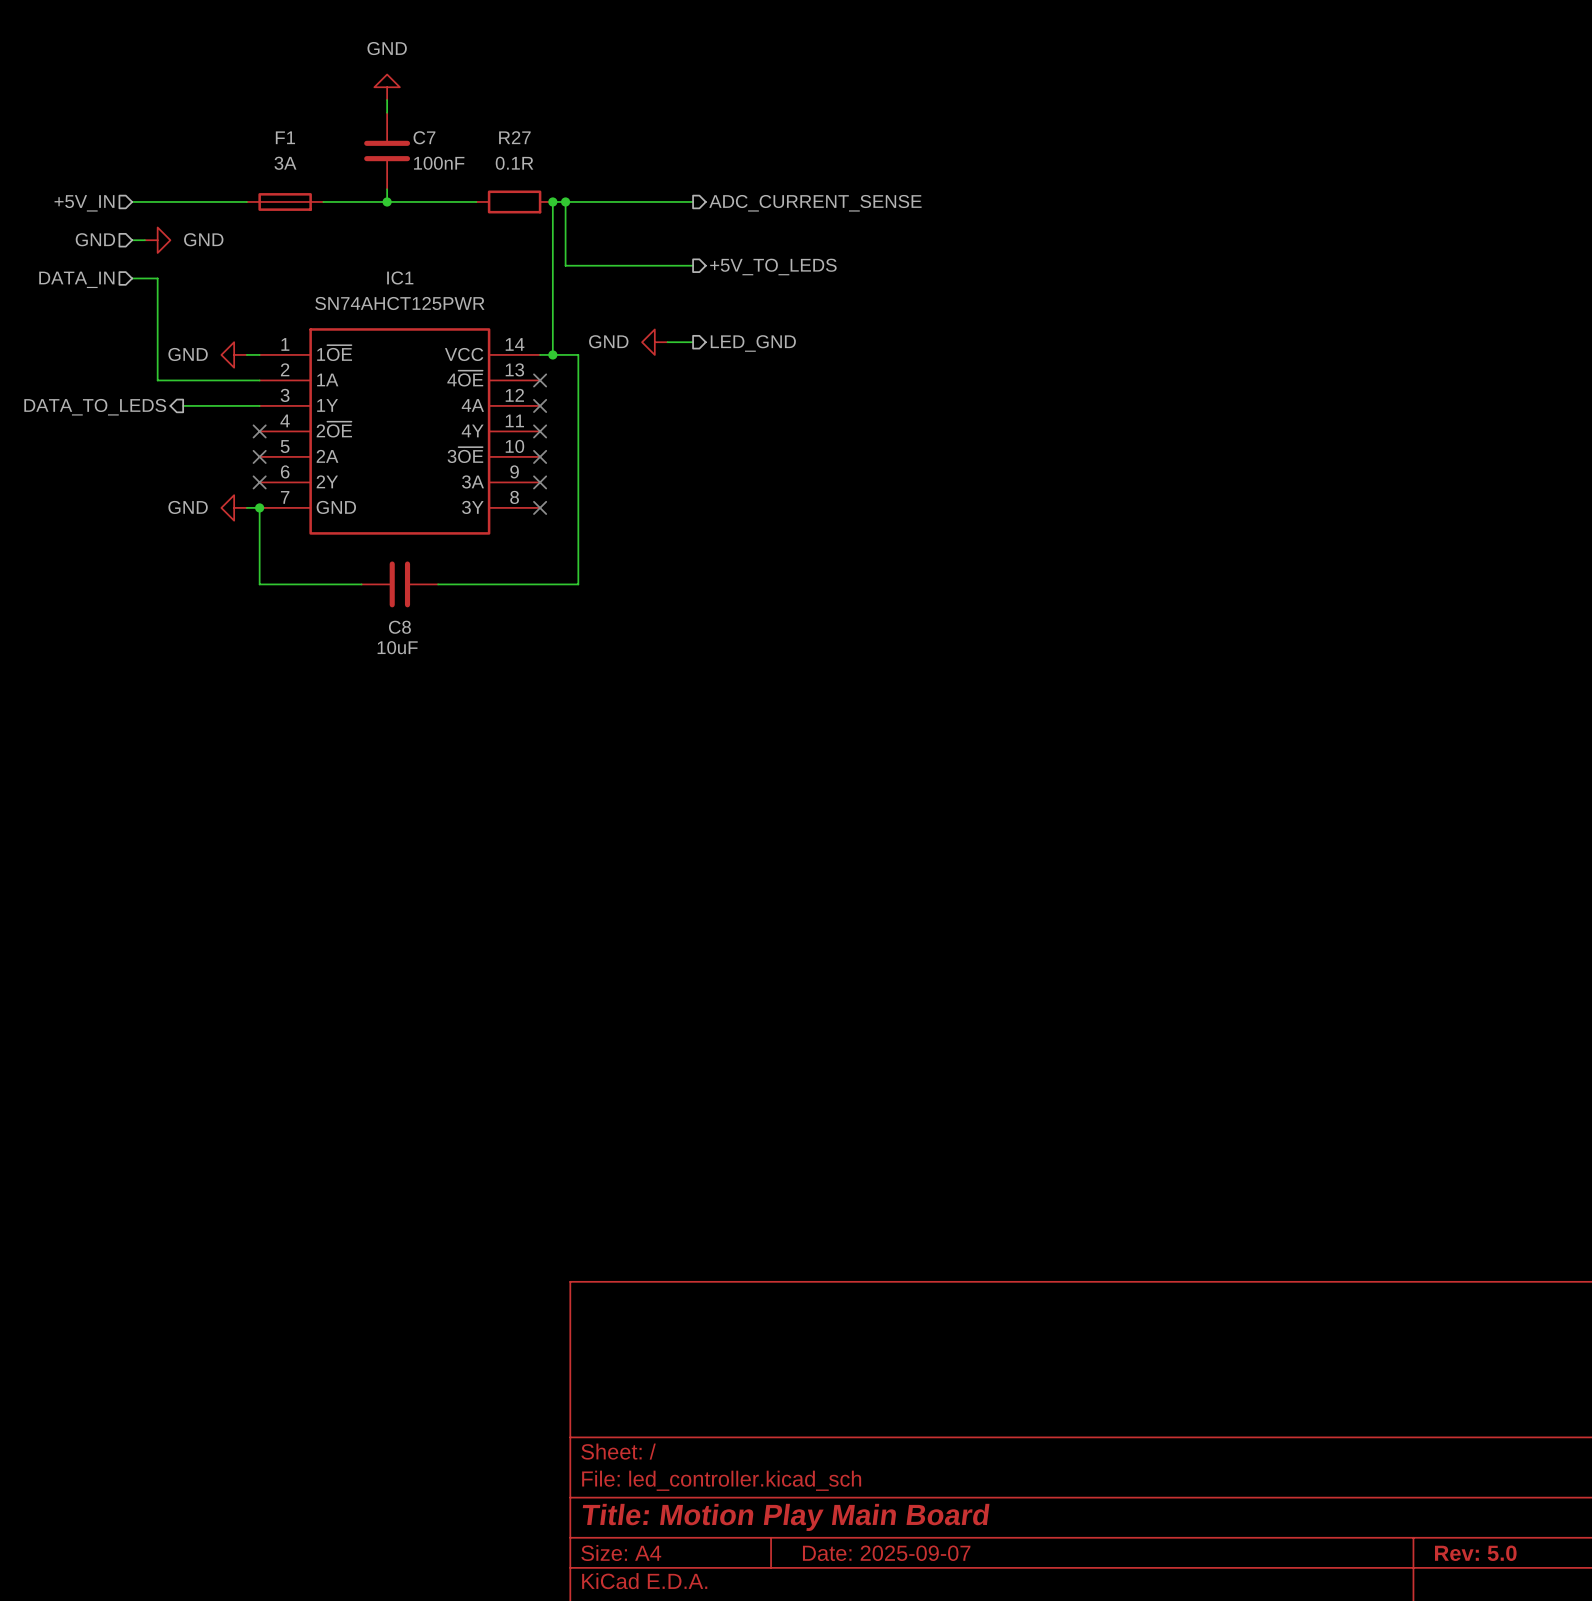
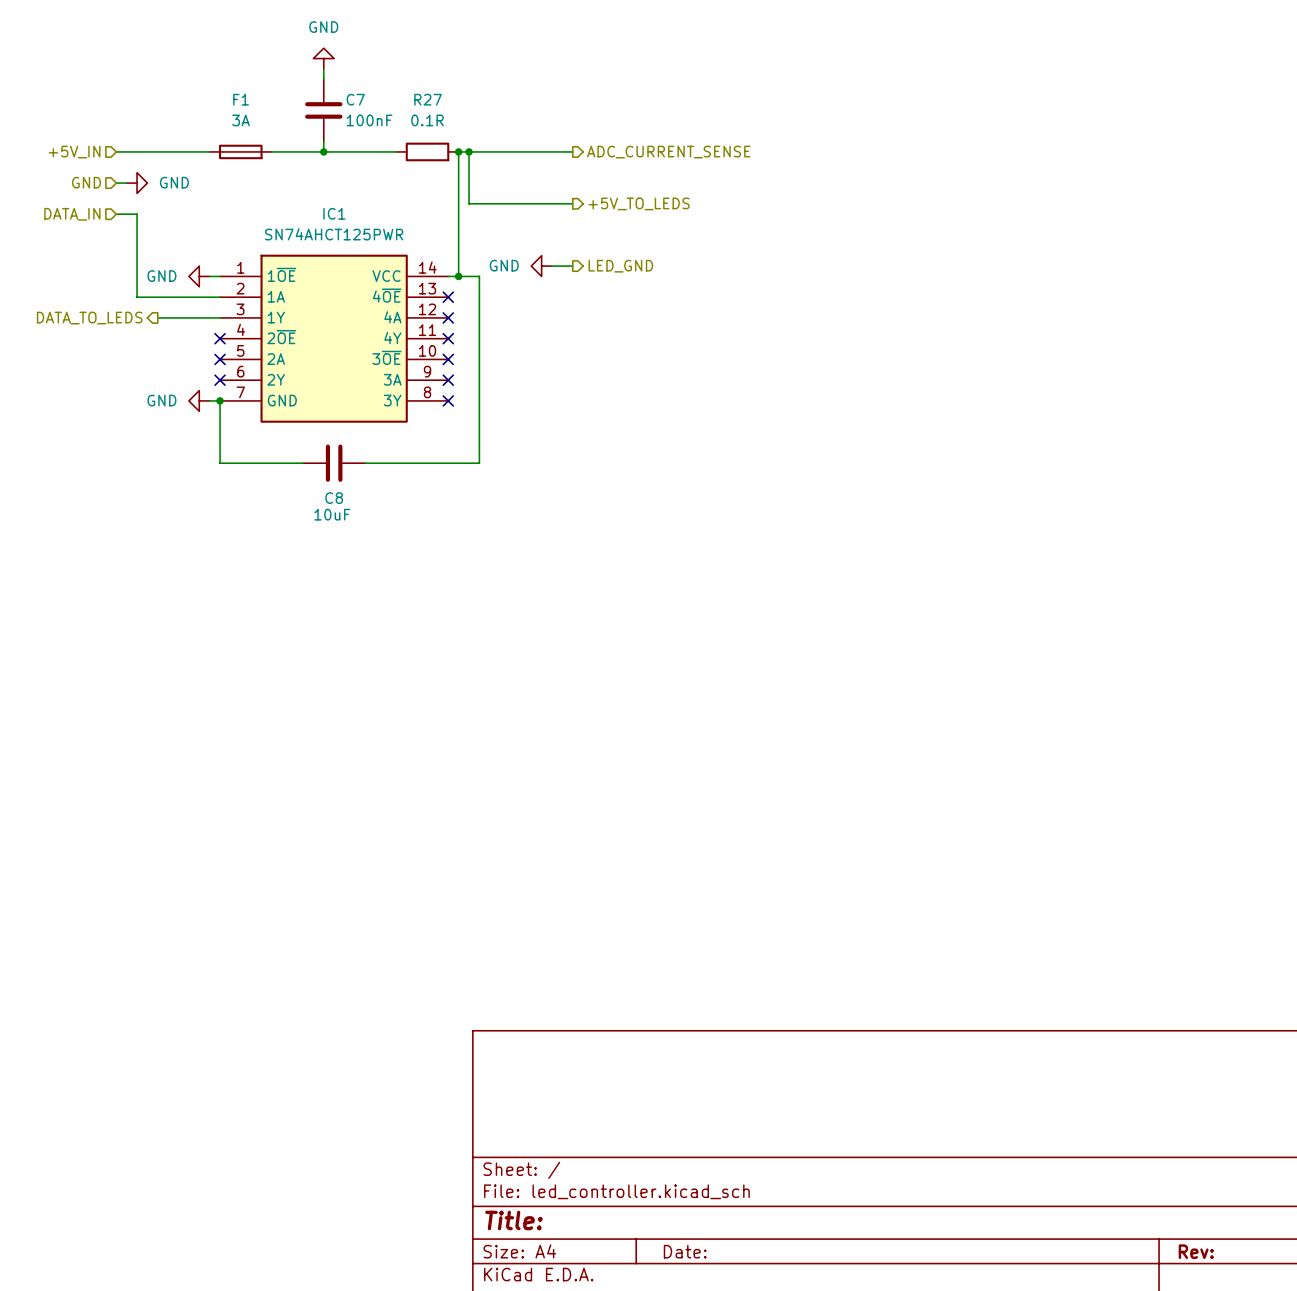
title block: Title: Motion Play Main Board (786, 1517) -> Title: (513, 1220)
title block: Date: 2025-09-07 (886, 1553) -> Date: (685, 1251)
title block: Rev: 5.0 (1475, 1553) -> Rev: (1196, 1251)

